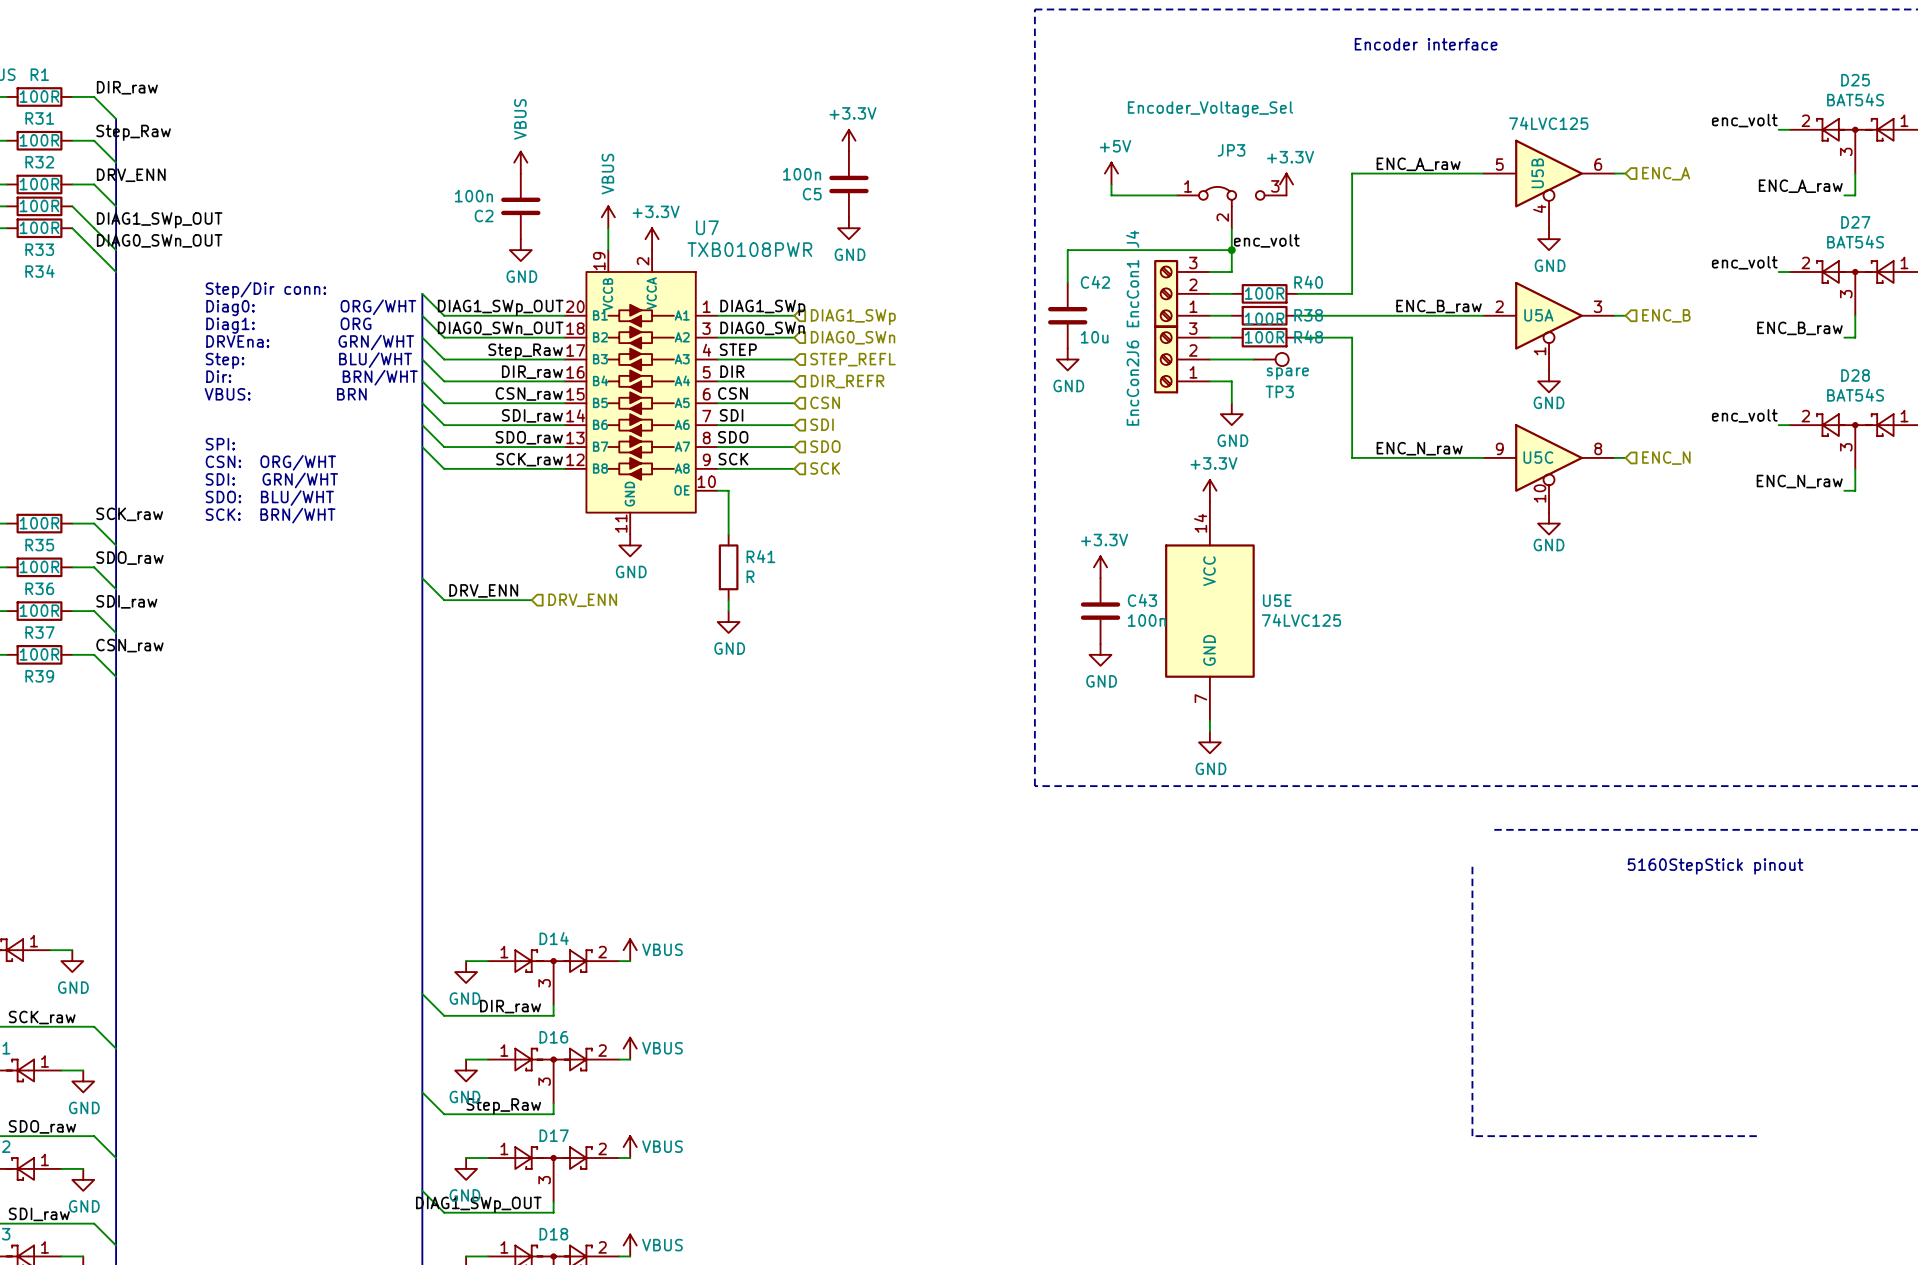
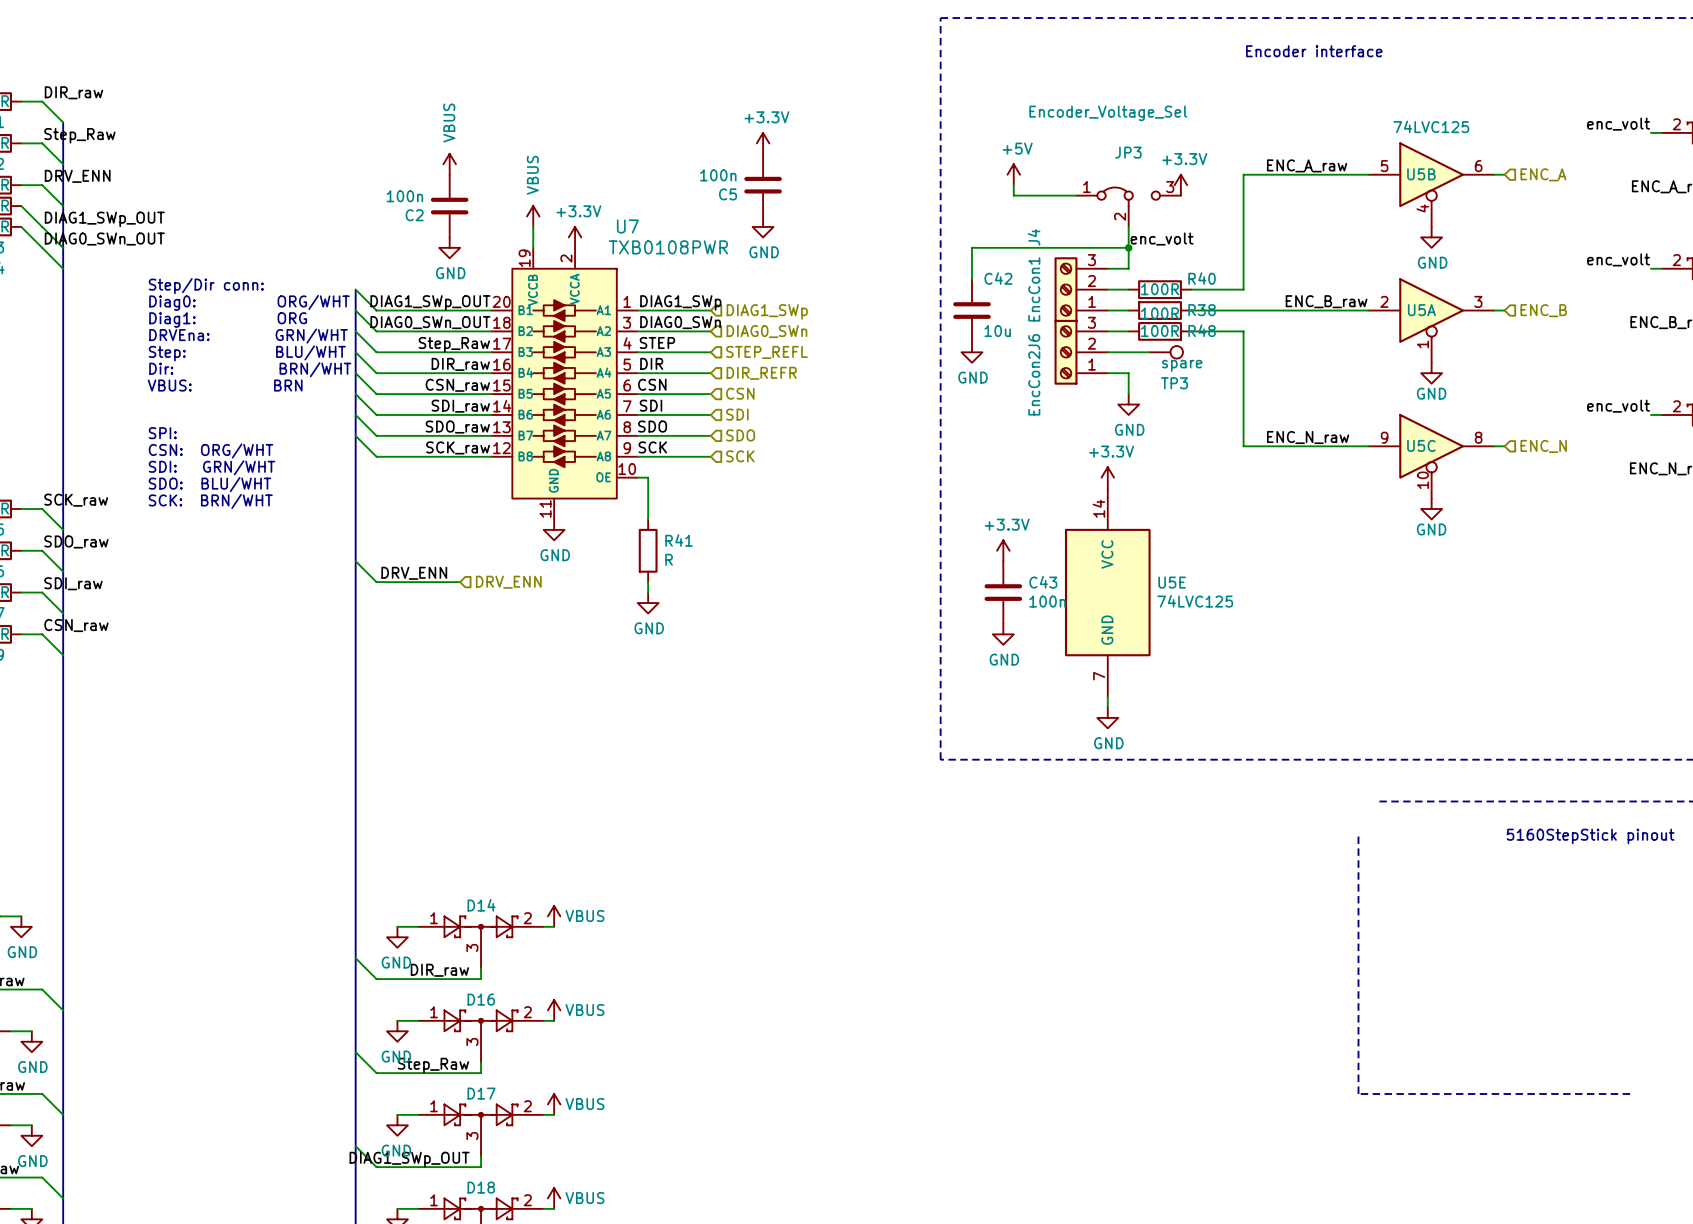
U5B name rotation: 0° (1537, 173) -> 90° clockwise (1421, 174)

